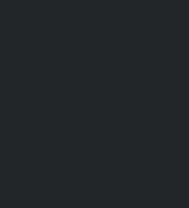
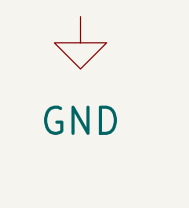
power symbol: none -> GND (80, 42)

